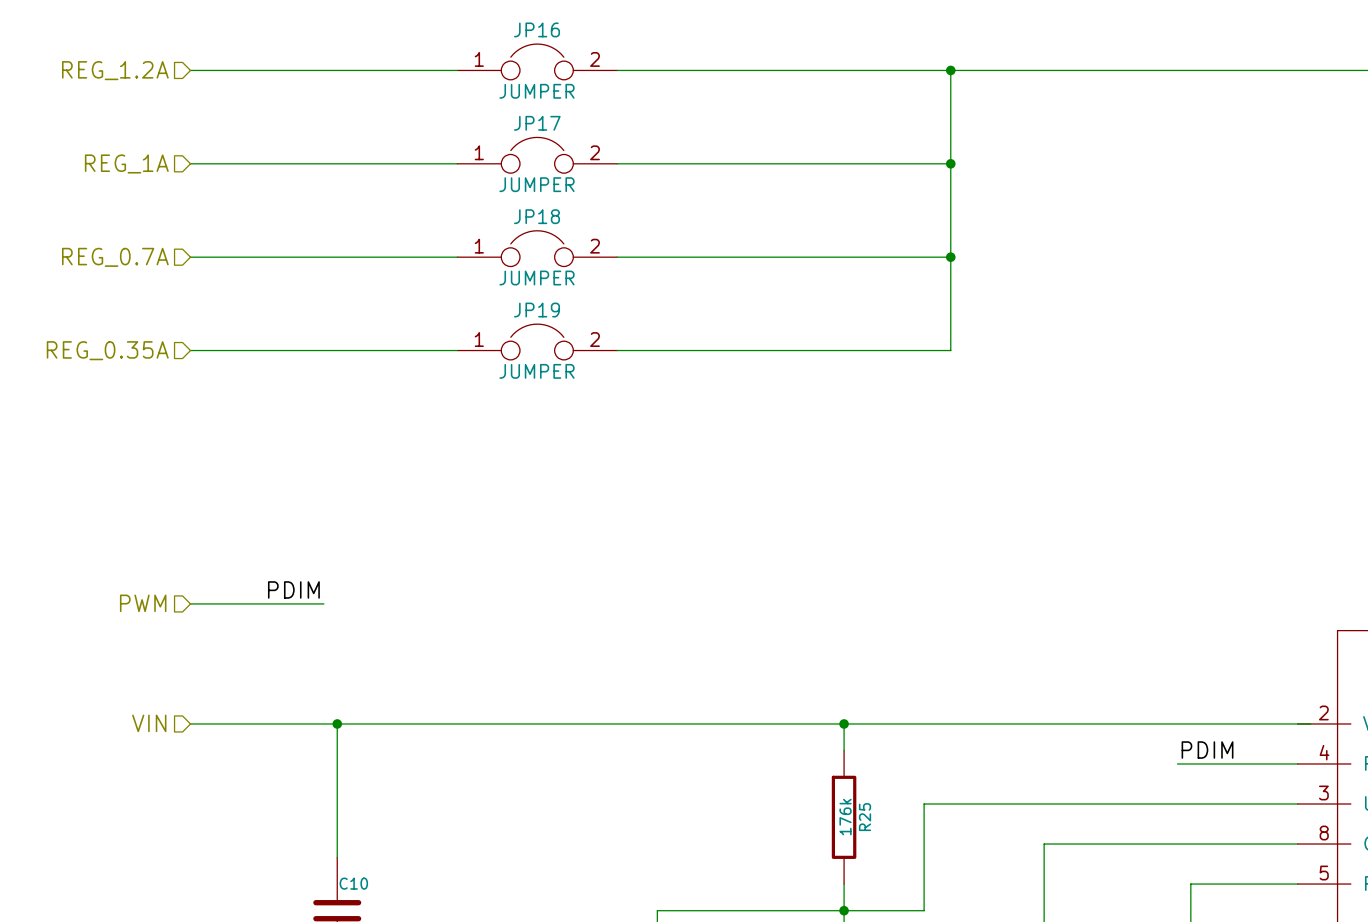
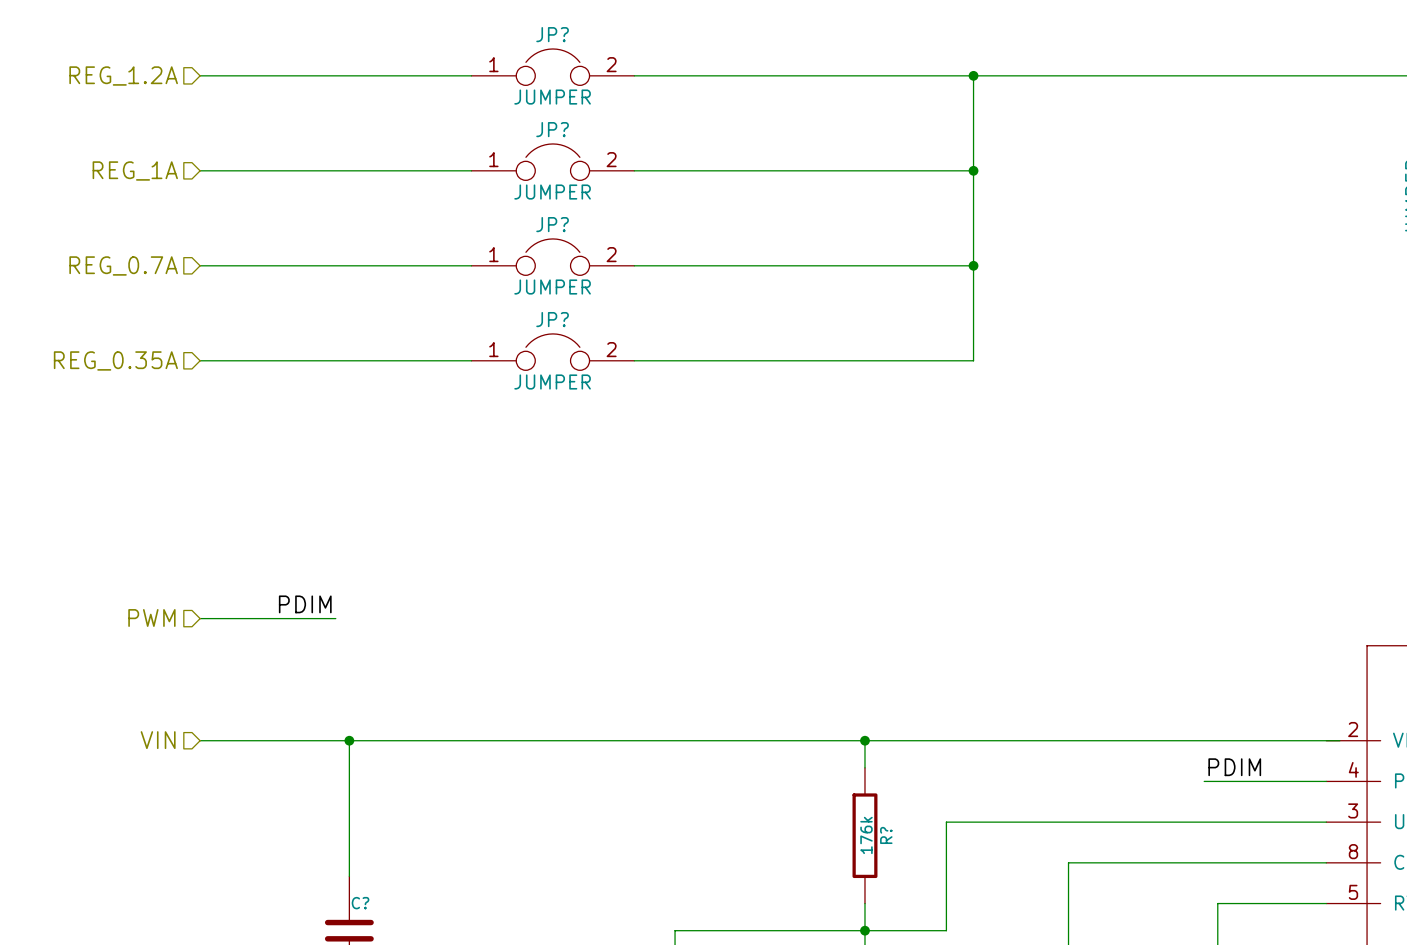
JP16 name: JP16 (536, 29) -> JP? (552, 34)
JP17 name: JP17 (537, 123) -> JP? (552, 129)
JP18 name: JP18 (536, 216) -> JP? (552, 224)
JP19 name: JP19 (536, 310) -> JP? (552, 319)
R25 name: R25 (865, 817) -> R? (886, 835)
C10 name: C10 (353, 883) -> C? (360, 903)

